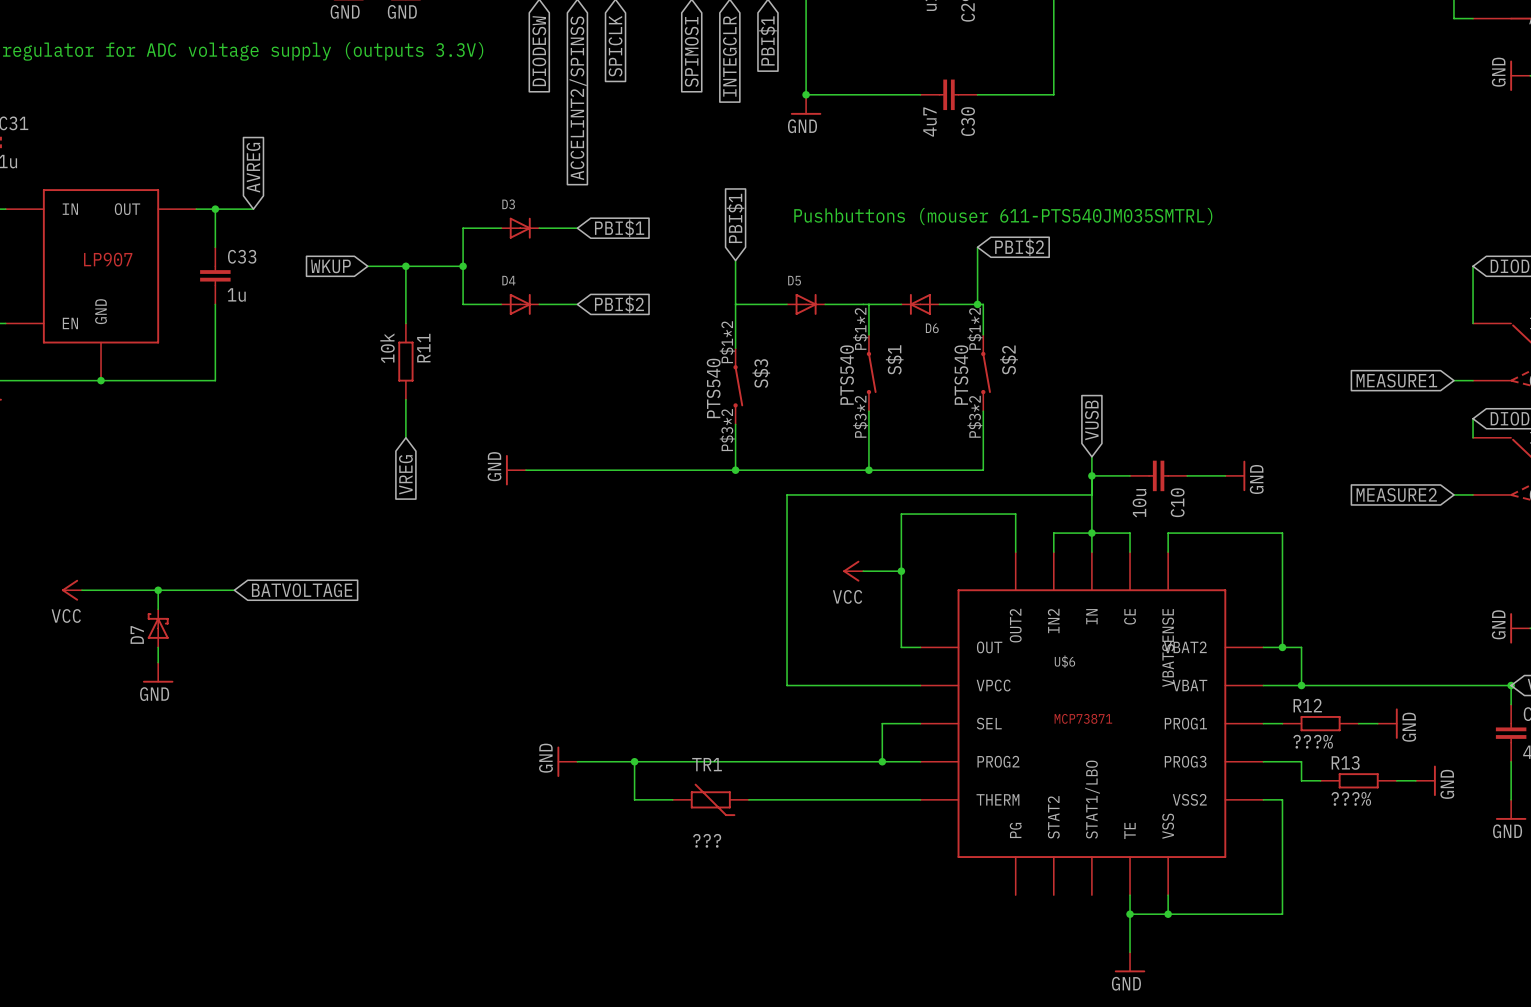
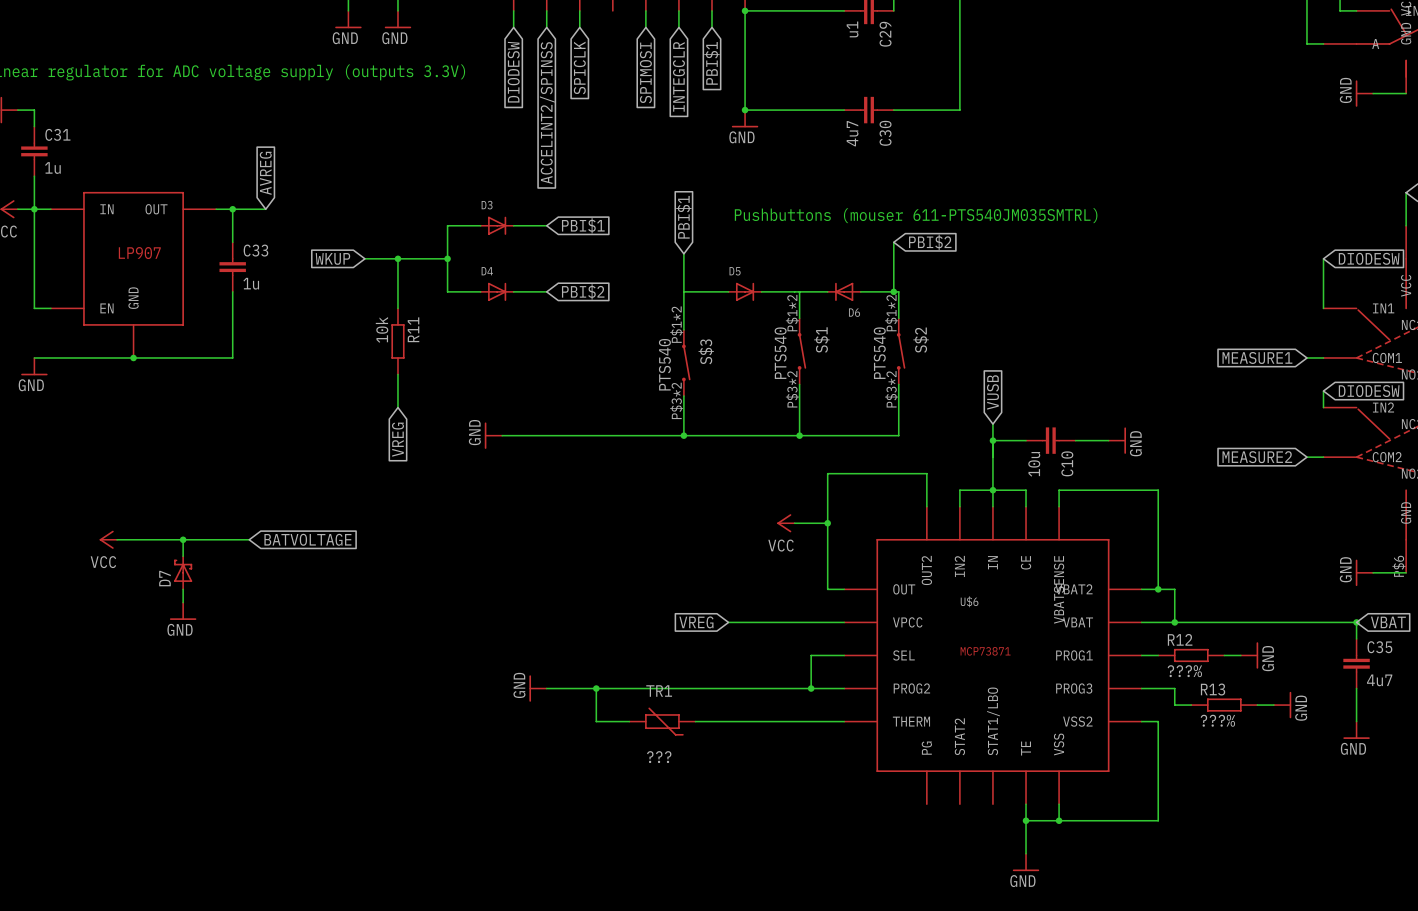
wire: (1091, 494) (787, 494) (787, 685) -> none
global label: none -> VREG (696, 622)

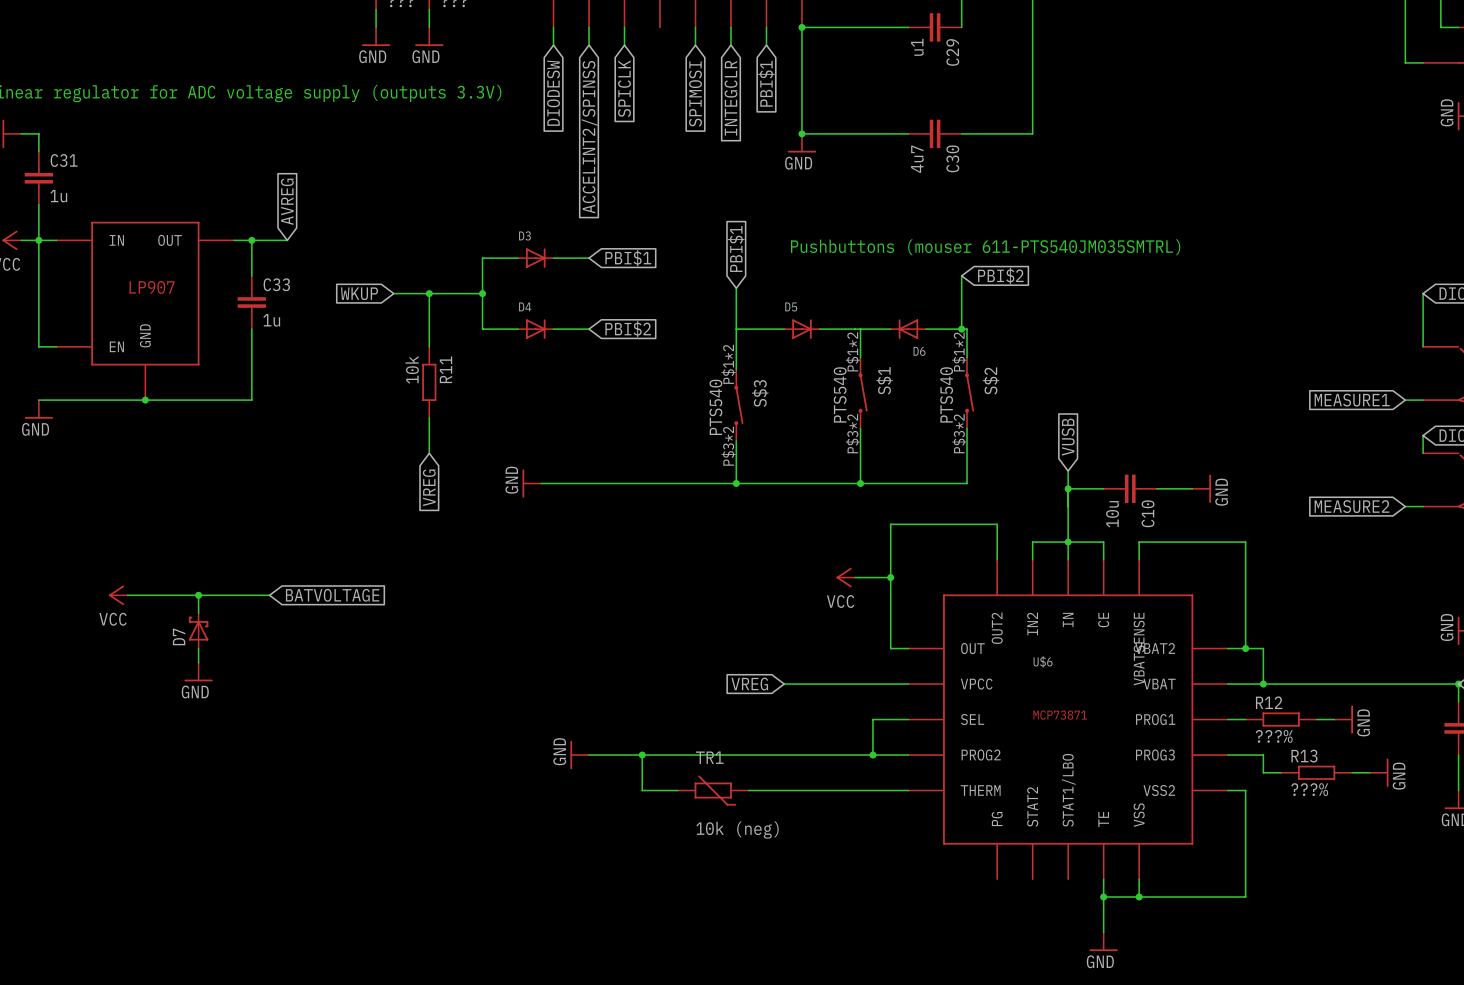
TR1 value: ??? (659, 757) -> 10k (neg) (737, 830)

